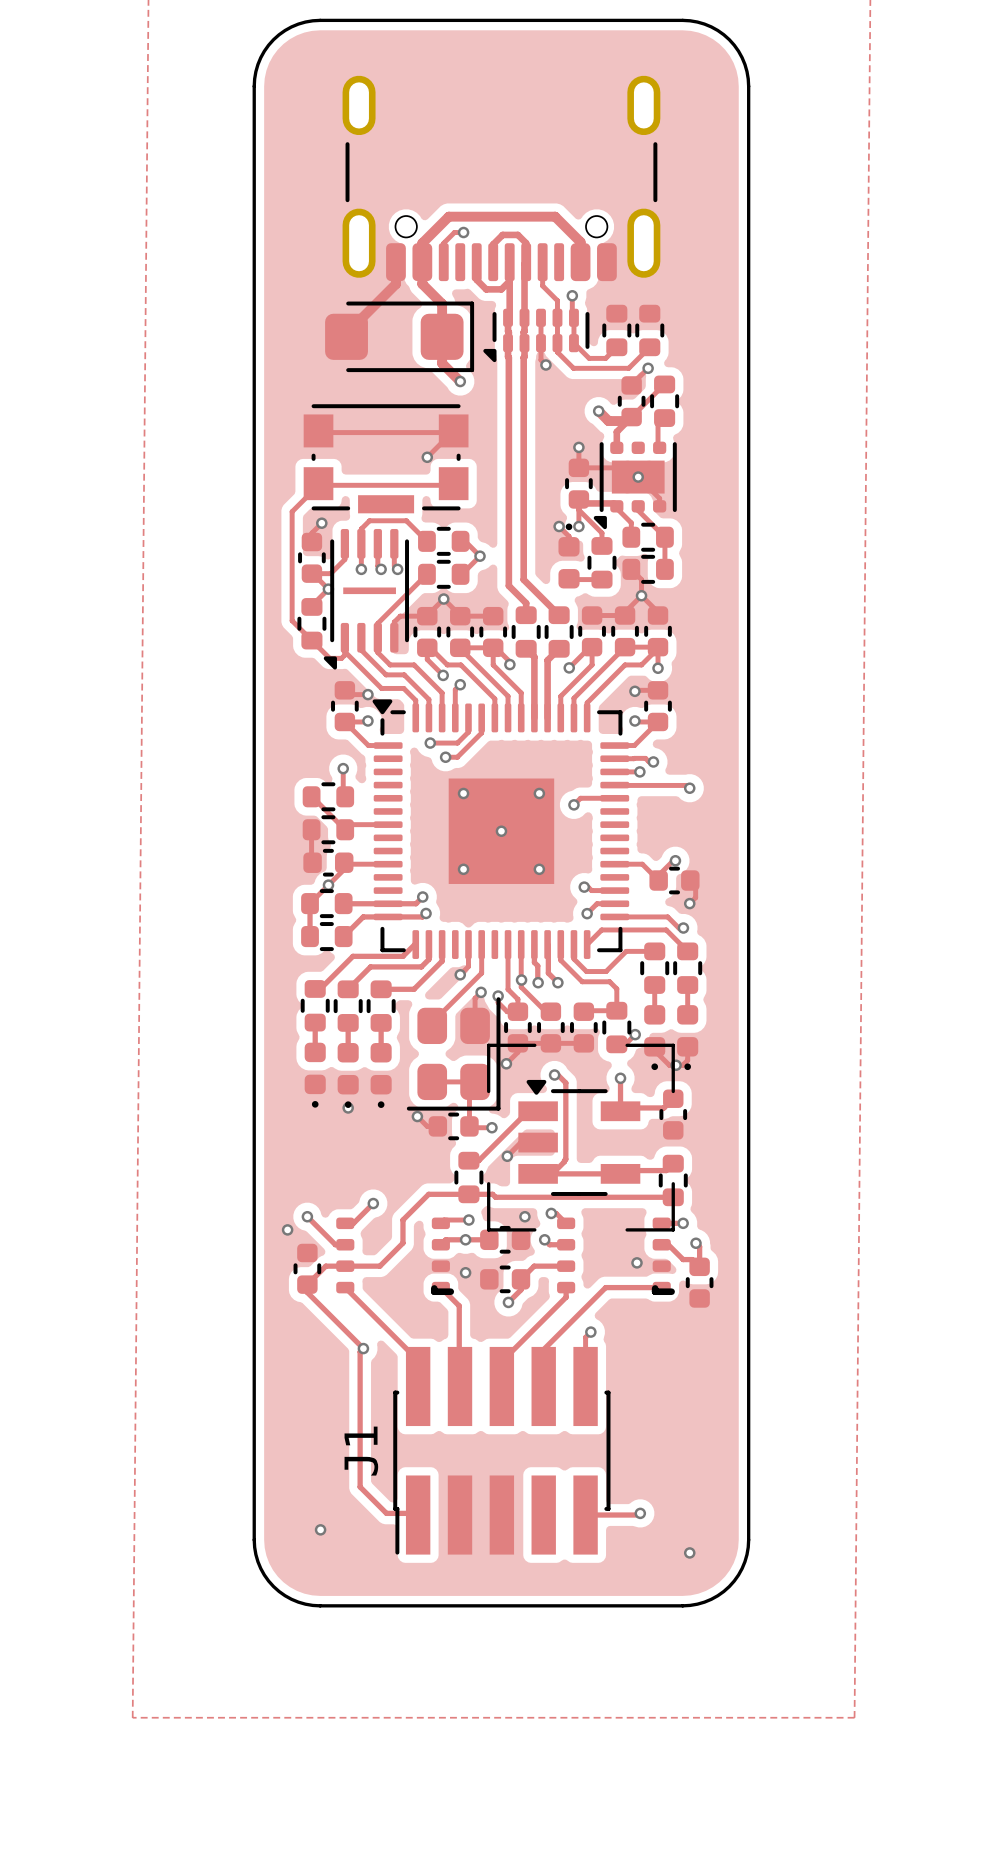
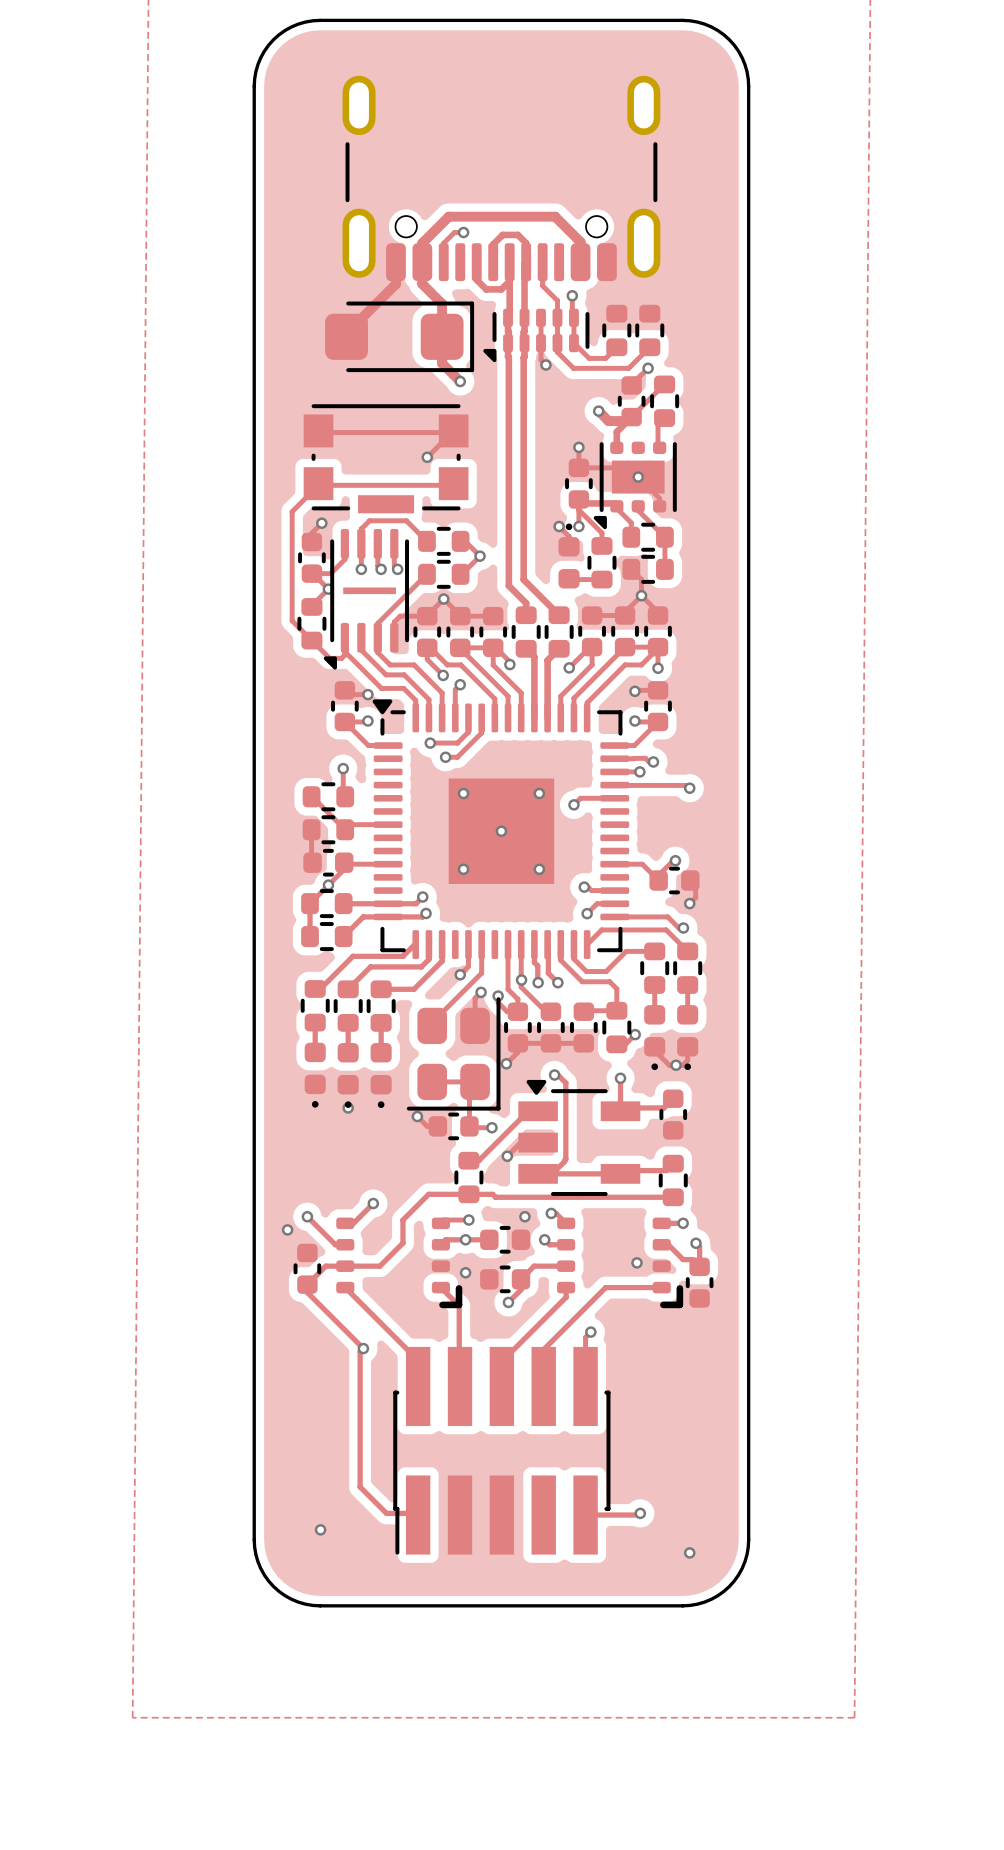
drawing: [487, 1043, 675, 1232] -> none
part footprint: [336, 1217, 455, 1296] -> [336, 1217, 463, 1309]
part footprint: [557, 1217, 675, 1296] -> [557, 1217, 684, 1309]
J1 name: J1 (361, 1451) -> none

